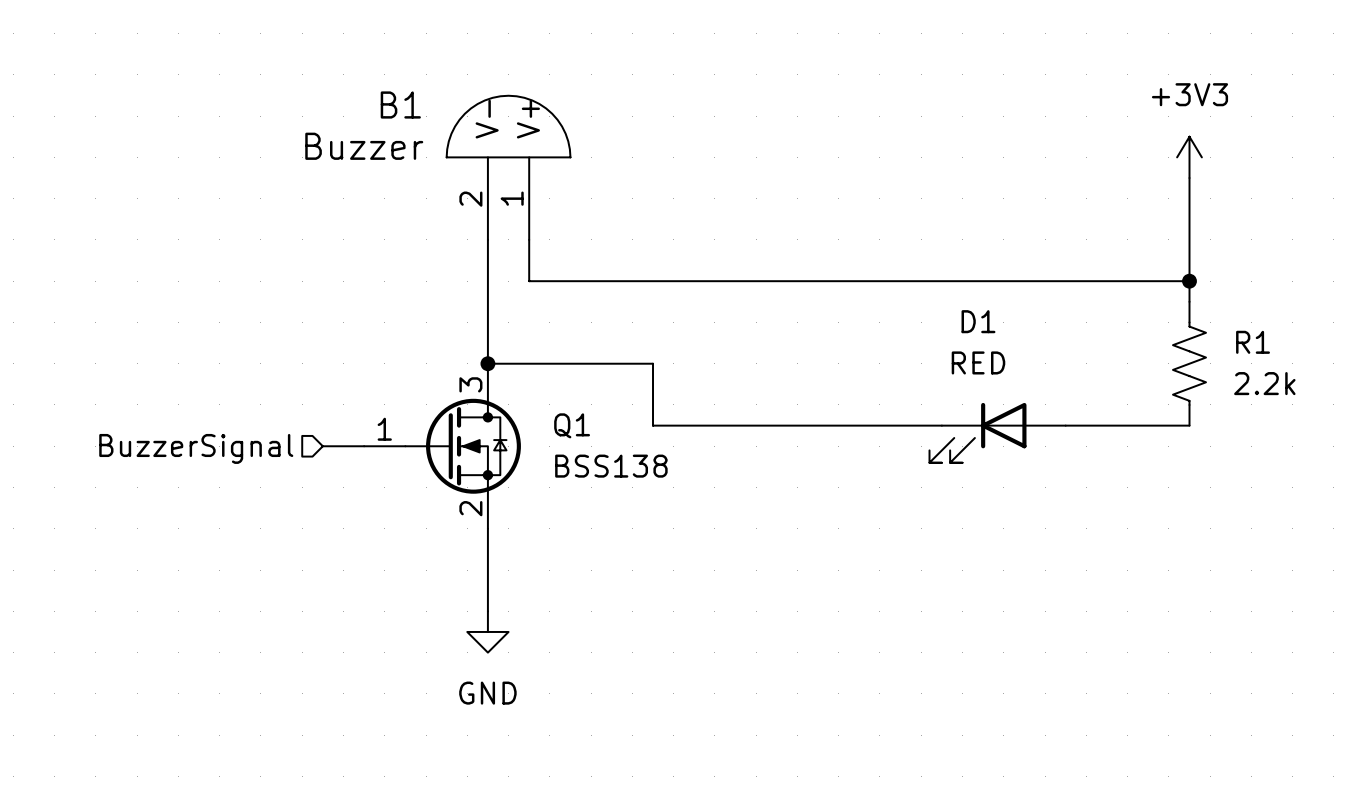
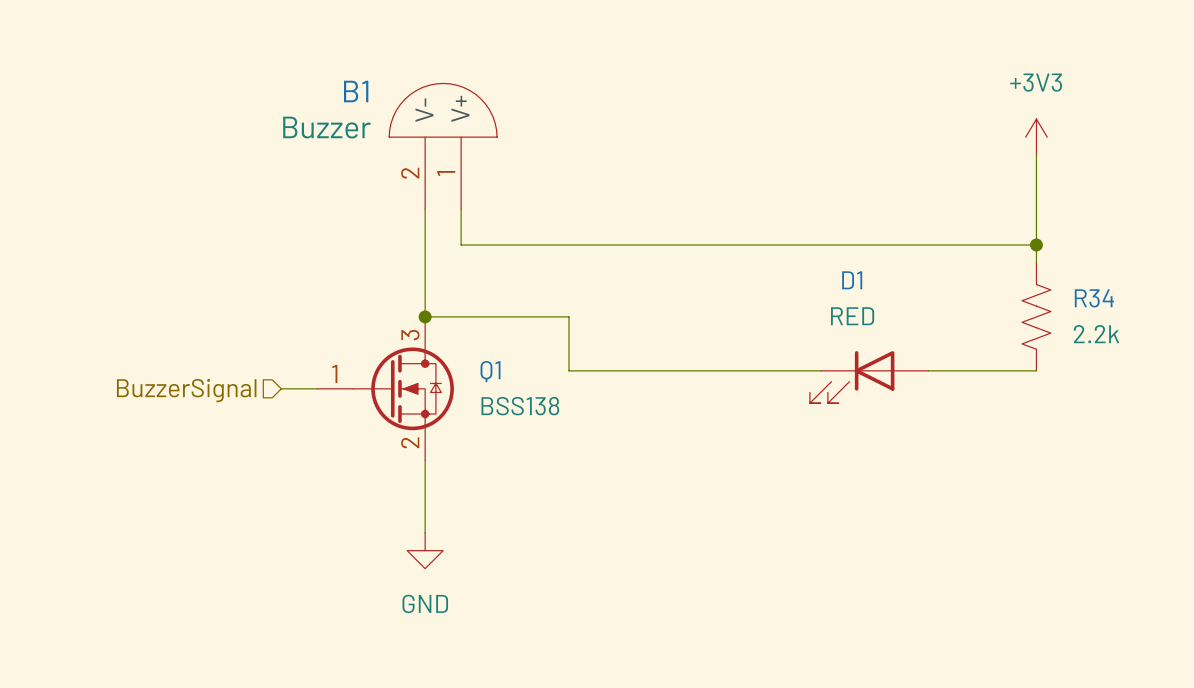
R1 name: R1 (1253, 342) -> R34 (1094, 298)

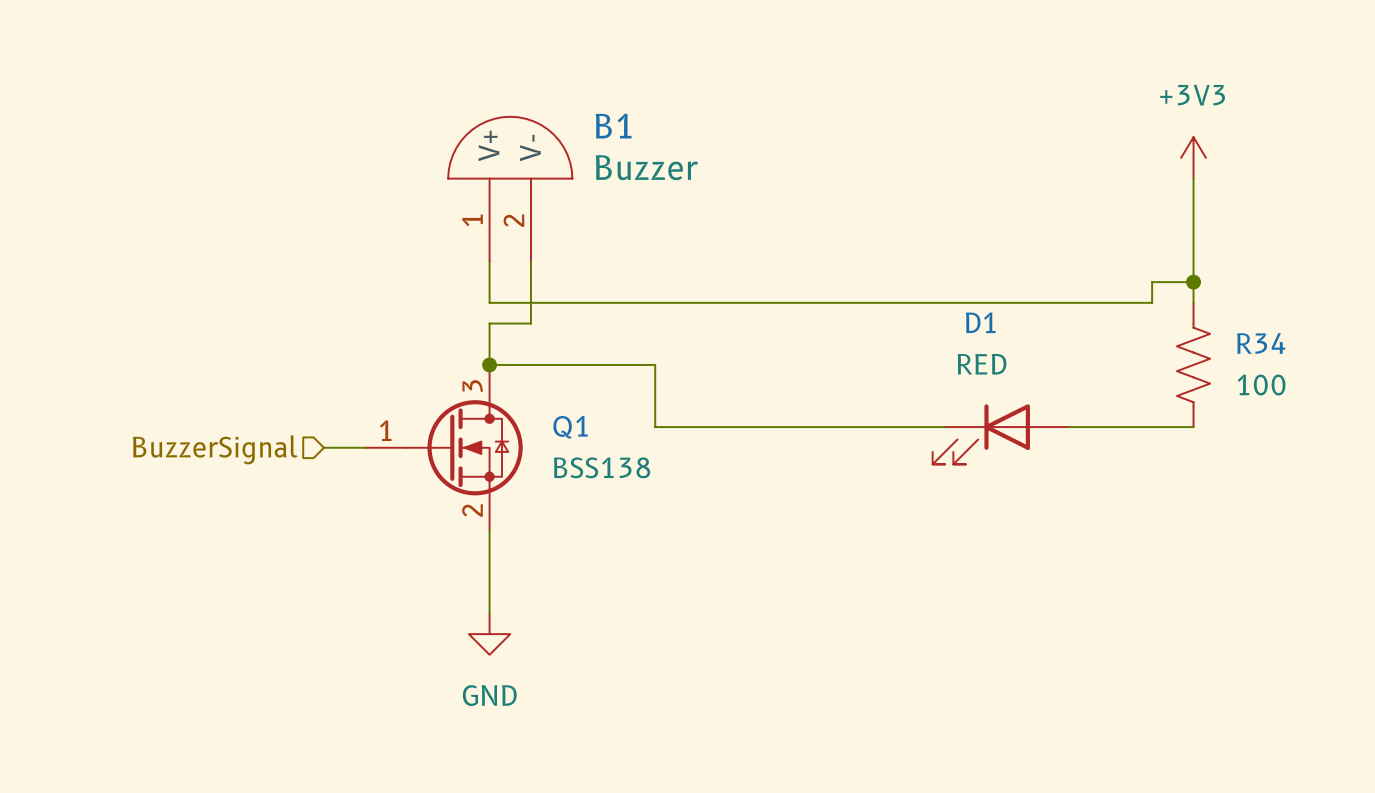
B1 flip: as is (443, 110) -> left-right (510, 147)
wire: (461, 245) (1000, 245) -> (489, 302) (1152, 302) (1152, 282)
wire: (425, 262) (425, 280) -> (530, 282) (530, 323) (489, 323)
R34 value: 2.2k (1096, 334) -> 100 (1261, 385)

